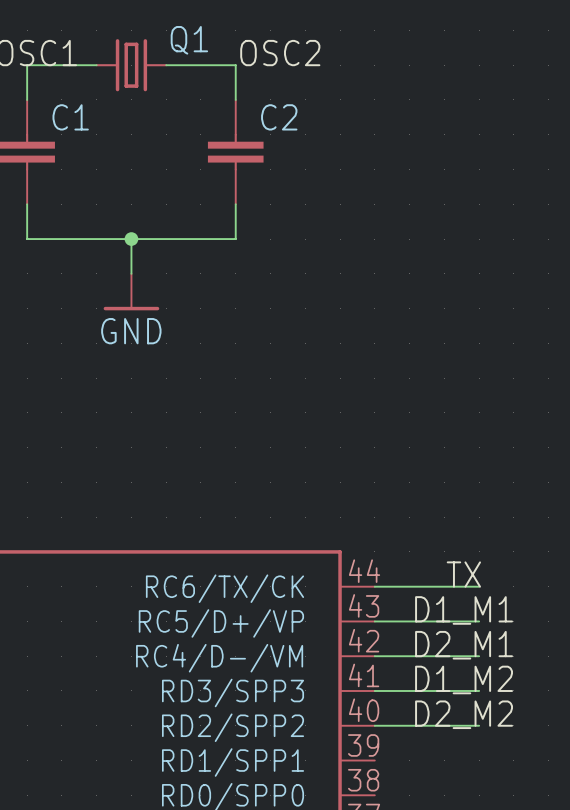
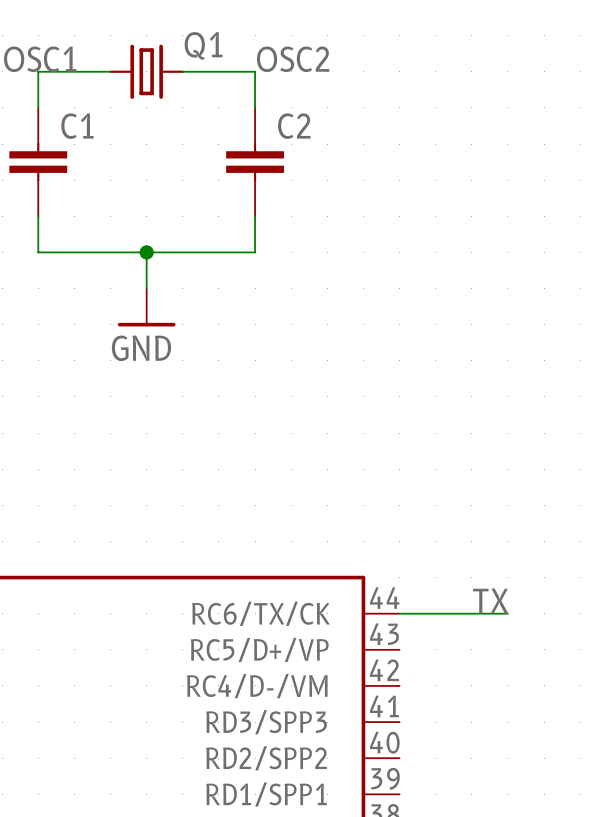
label: D1_M1 (464, 610) -> none
wire: (374, 621) (479, 621) -> none
label: D2_M1 (464, 645) -> none
wire: (374, 656) (479, 656) -> none
label: D1_M2 (464, 679) -> none
wire: (374, 690) (479, 690) -> none
label: D2_M2 (464, 714) -> none
wire: (374, 725) (479, 725) -> none

